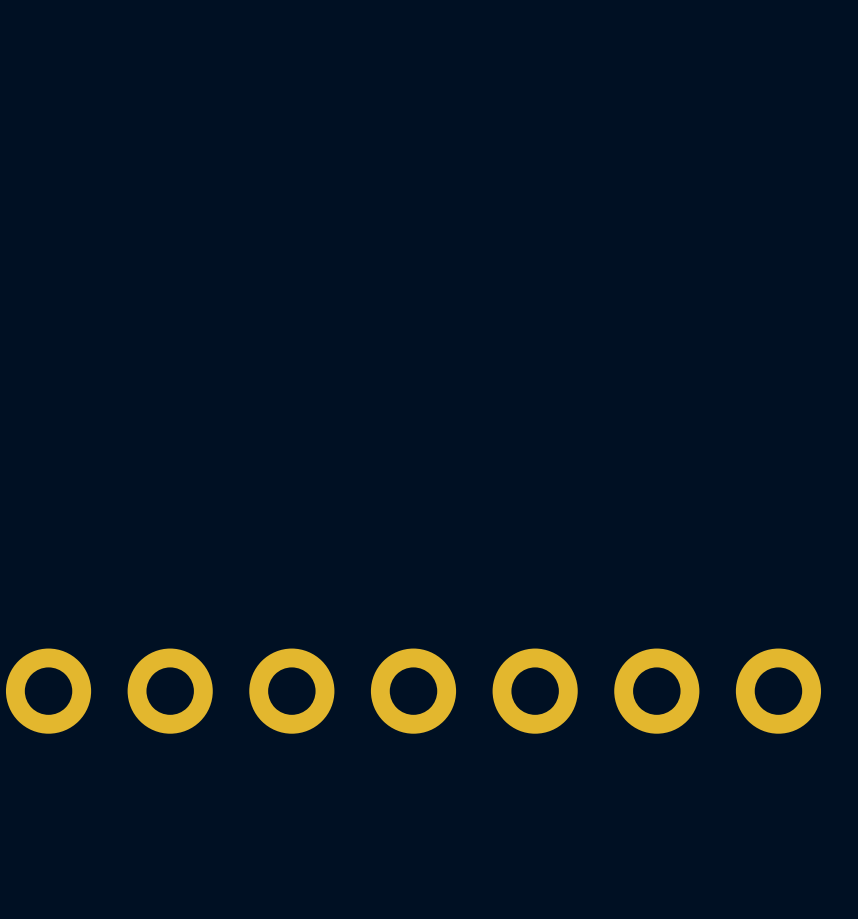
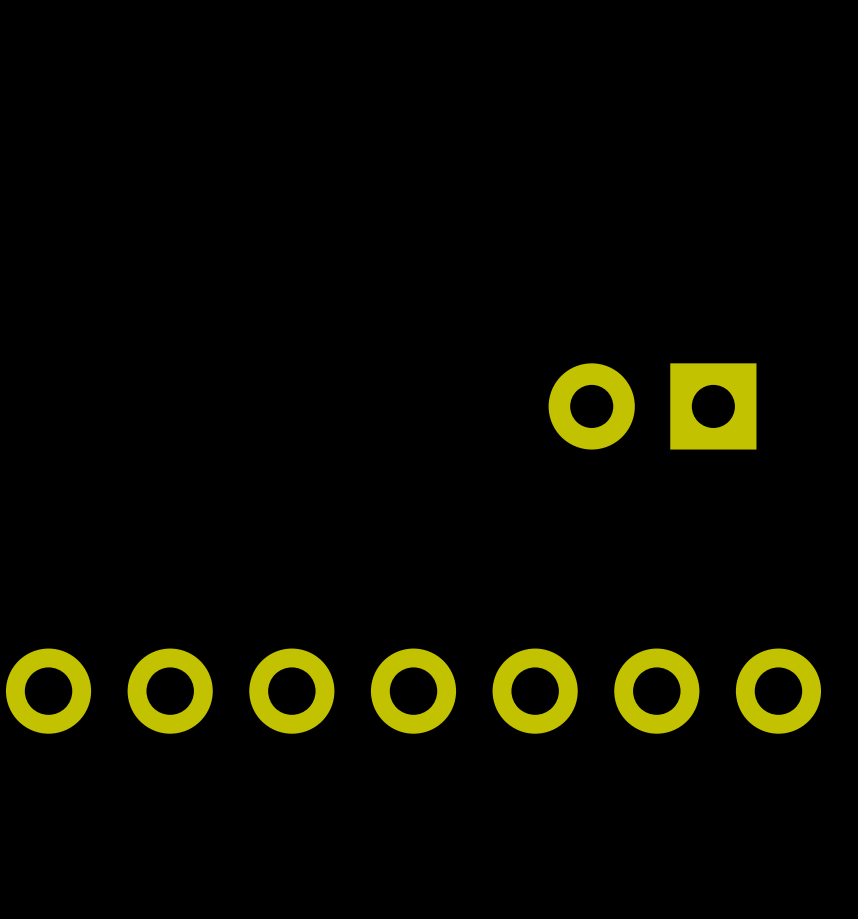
part: none -> (652, 406)

